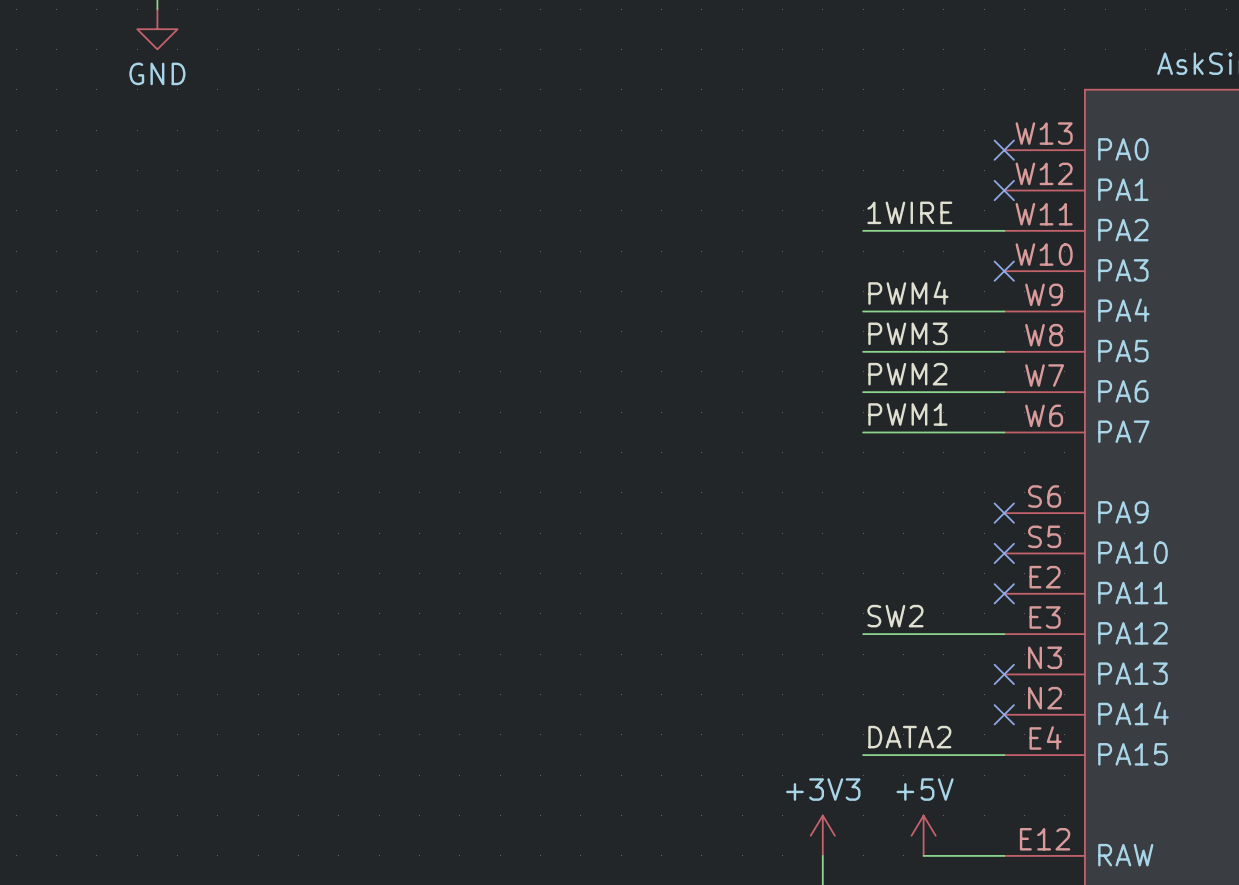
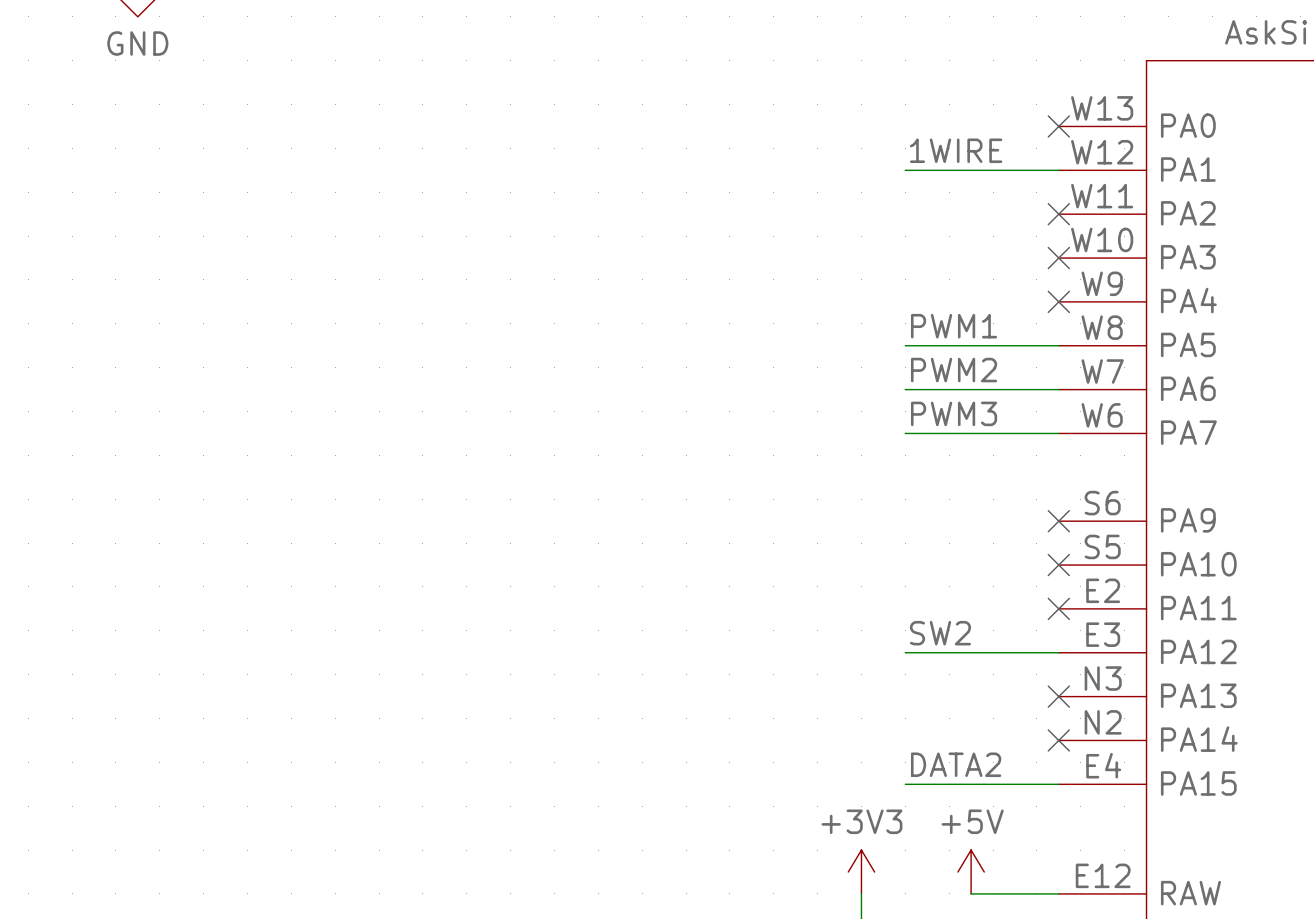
no-connect mark position: (1004, 190) -> (1058, 214)
label position: 1WIRE (909, 212) -> 1WIRE (956, 150)
wire: (863, 230) (1004, 230) -> (905, 170) (1058, 170)
label: PWM4 (908, 293) -> none
wire: (863, 311) (1004, 311) -> none
no-connect mark: none -> (1058, 301)
label: PWM3 (907, 333) -> PWM1 (954, 326)
label: PWM1 (907, 414) -> PWM3 (954, 413)

